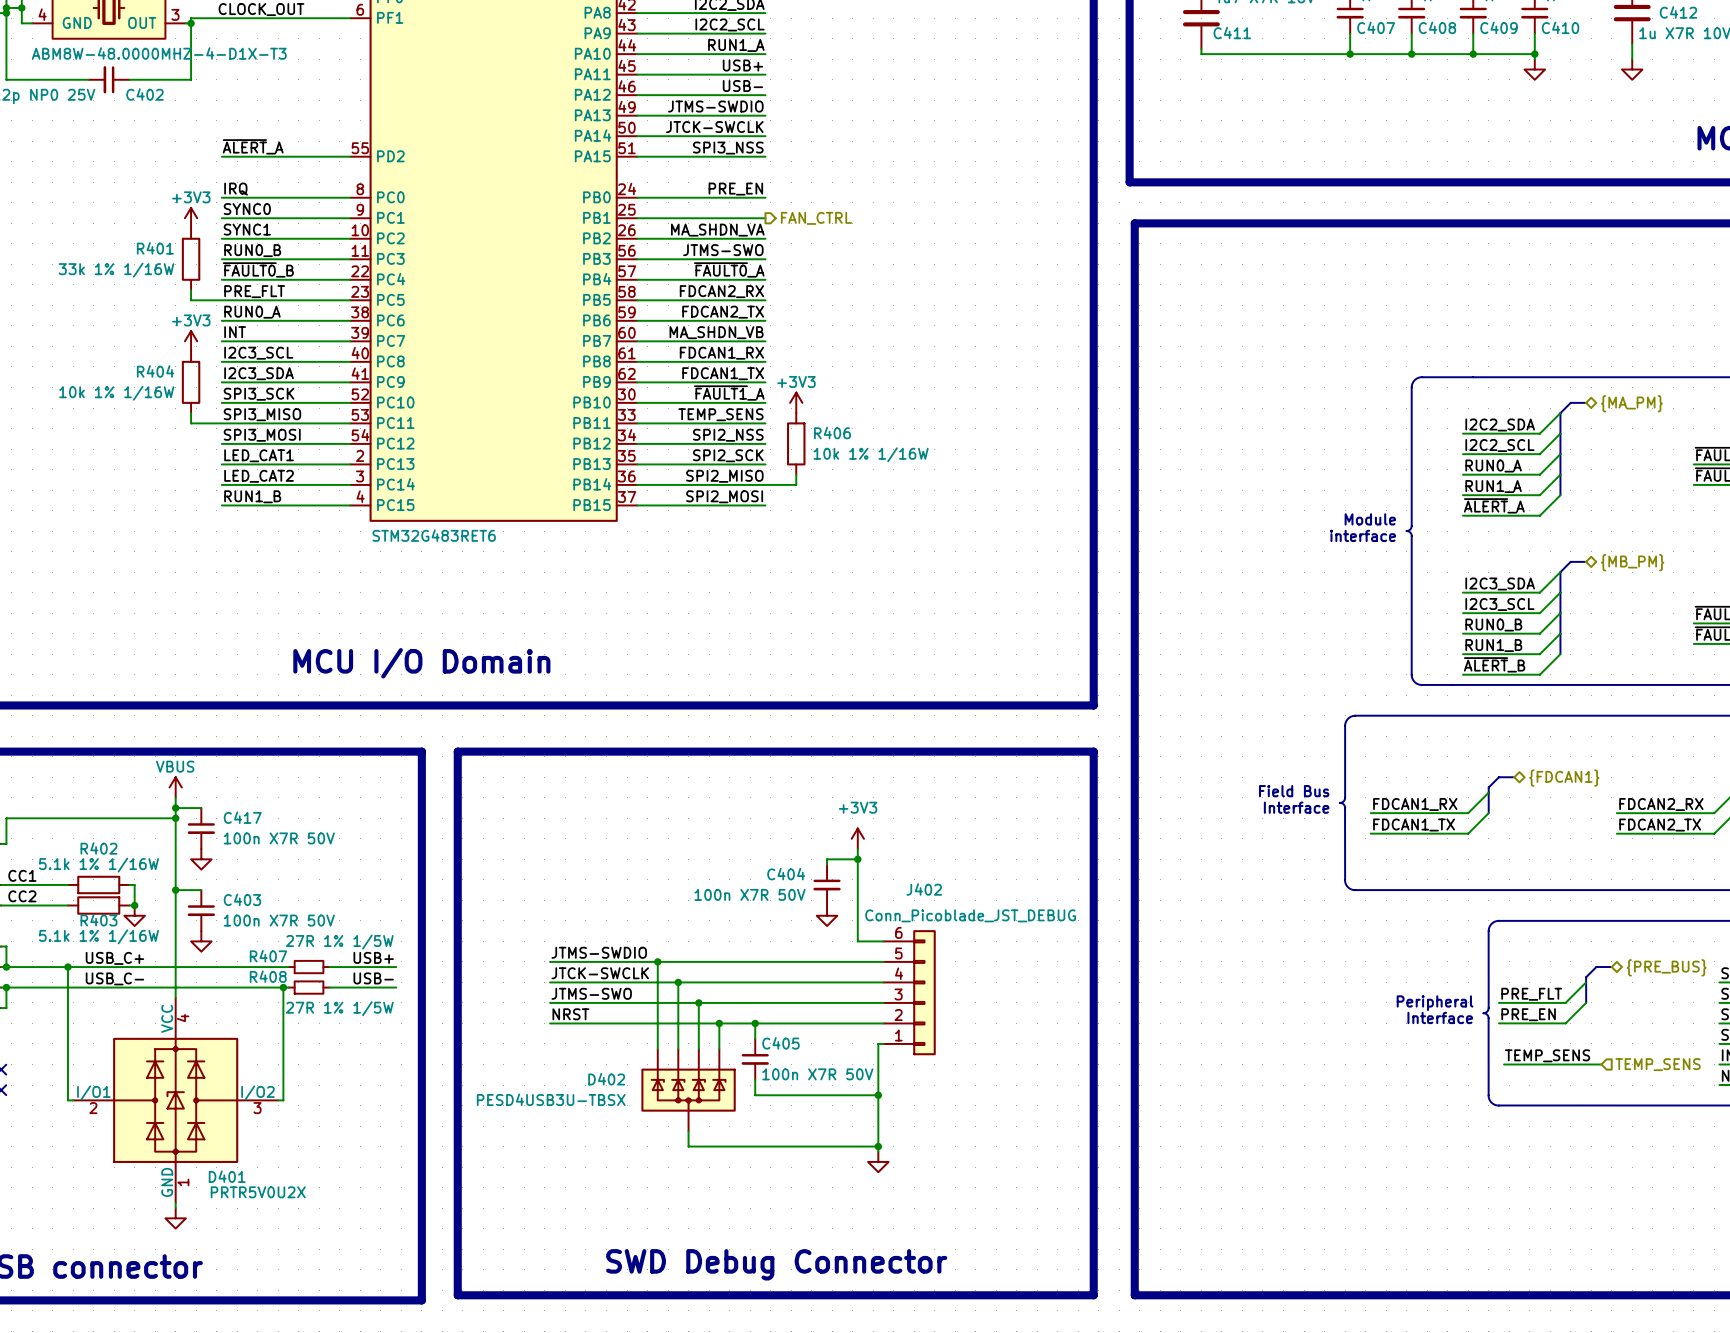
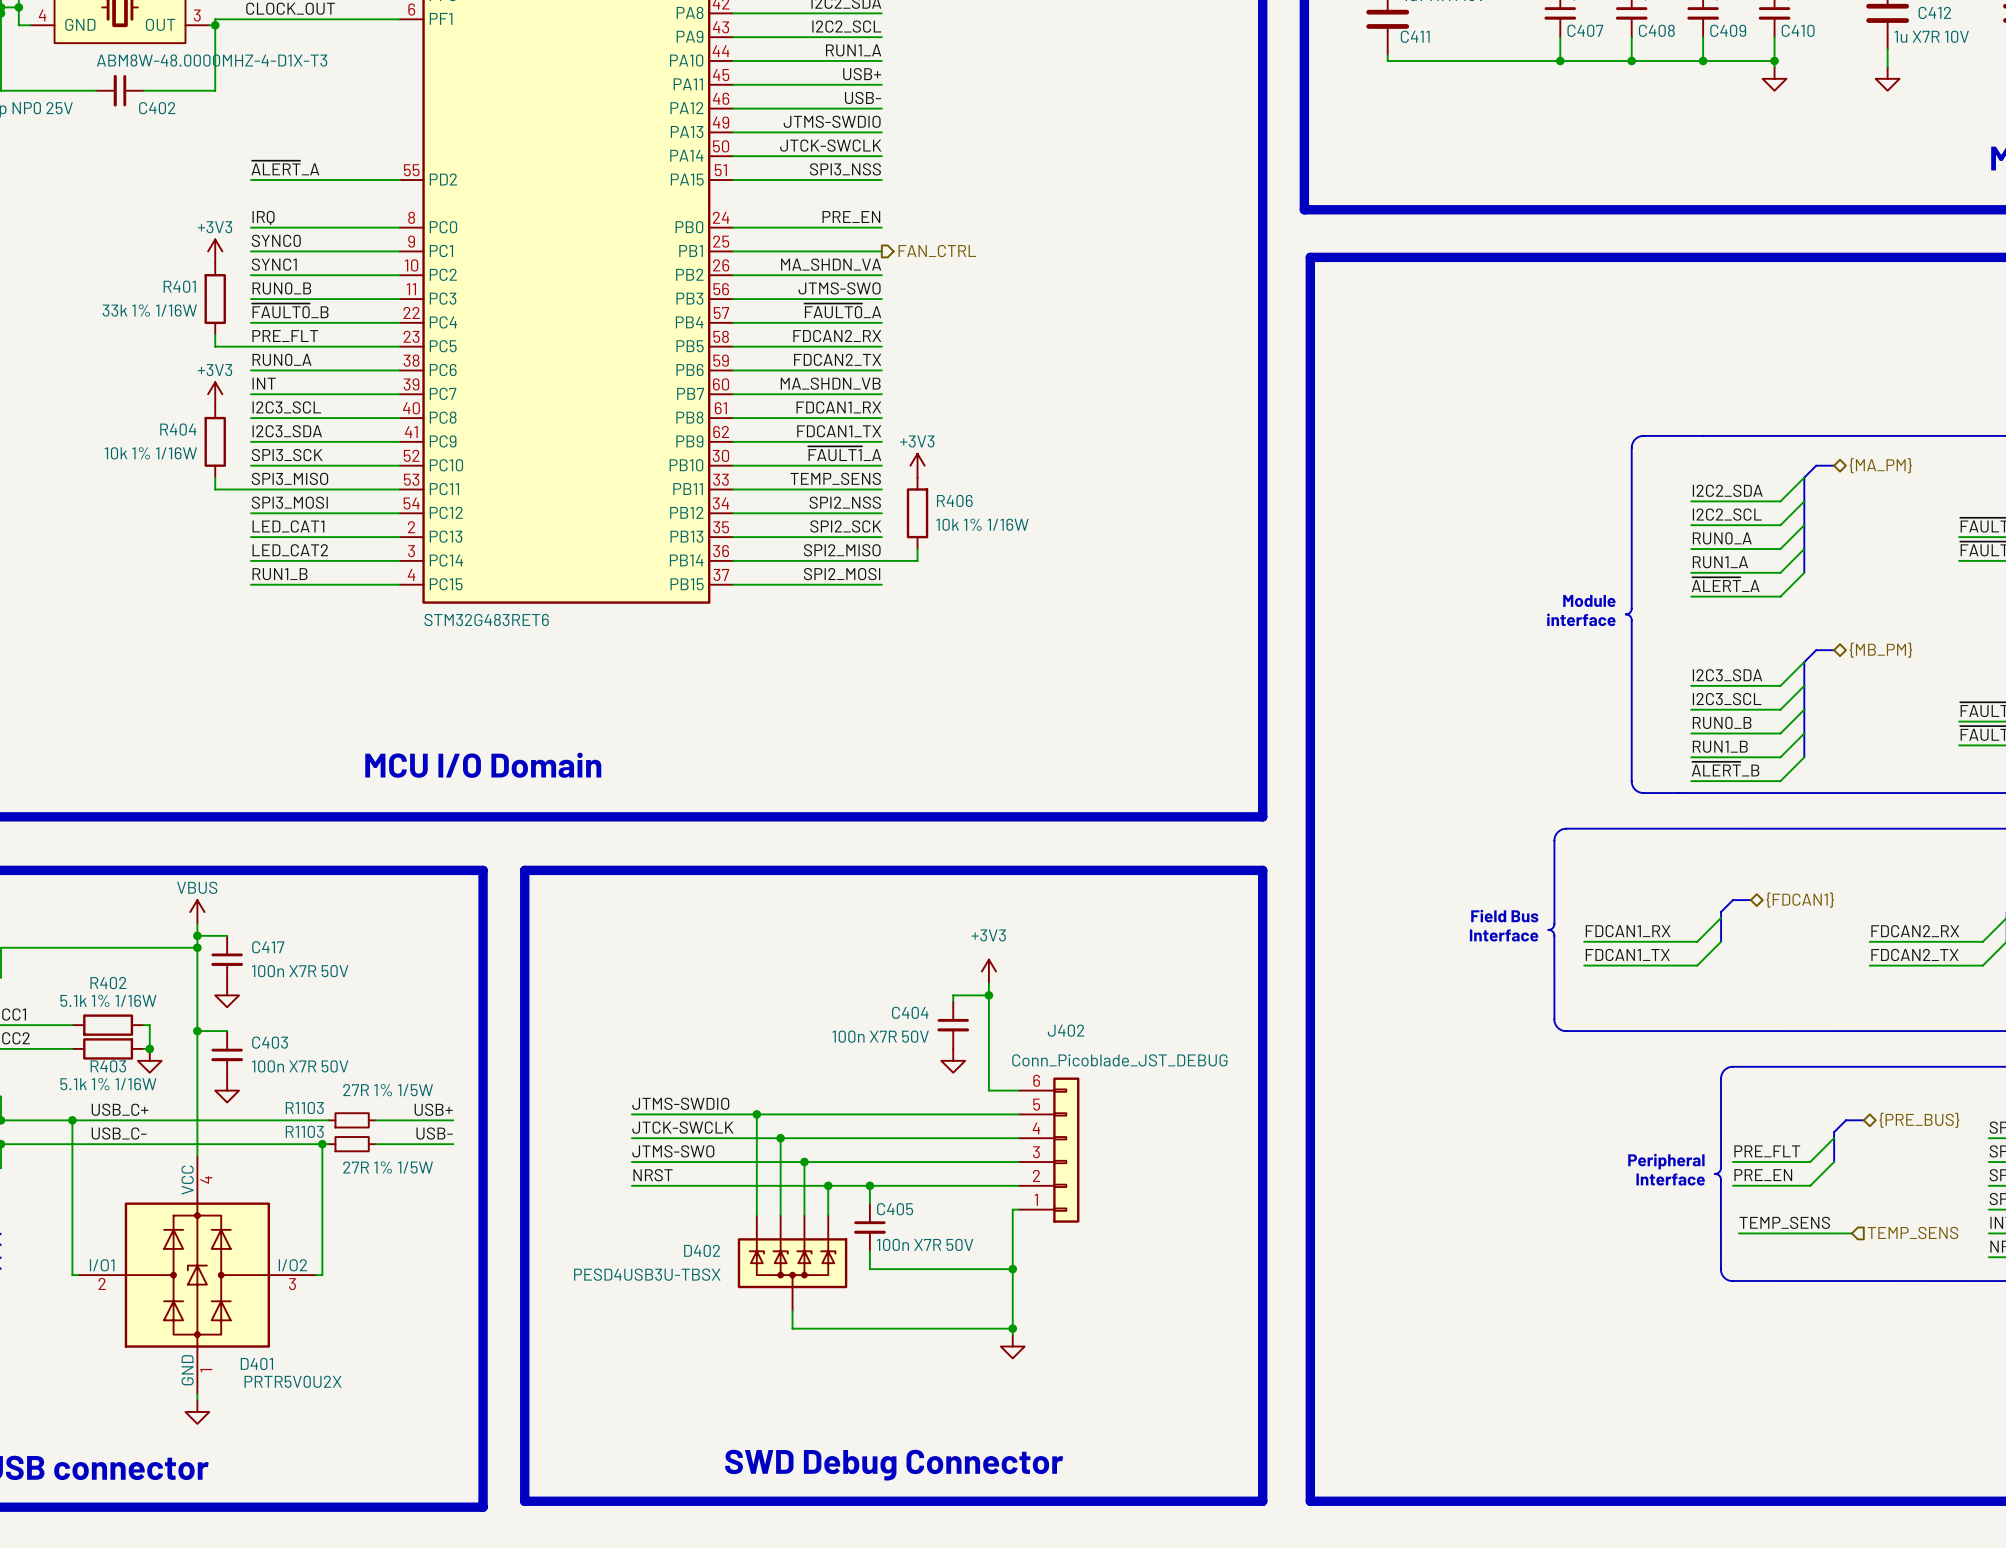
R407 name: R407 (268, 956) -> R1103 (304, 1108)
R408 name: R408 (268, 976) -> R1103 (304, 1131)

